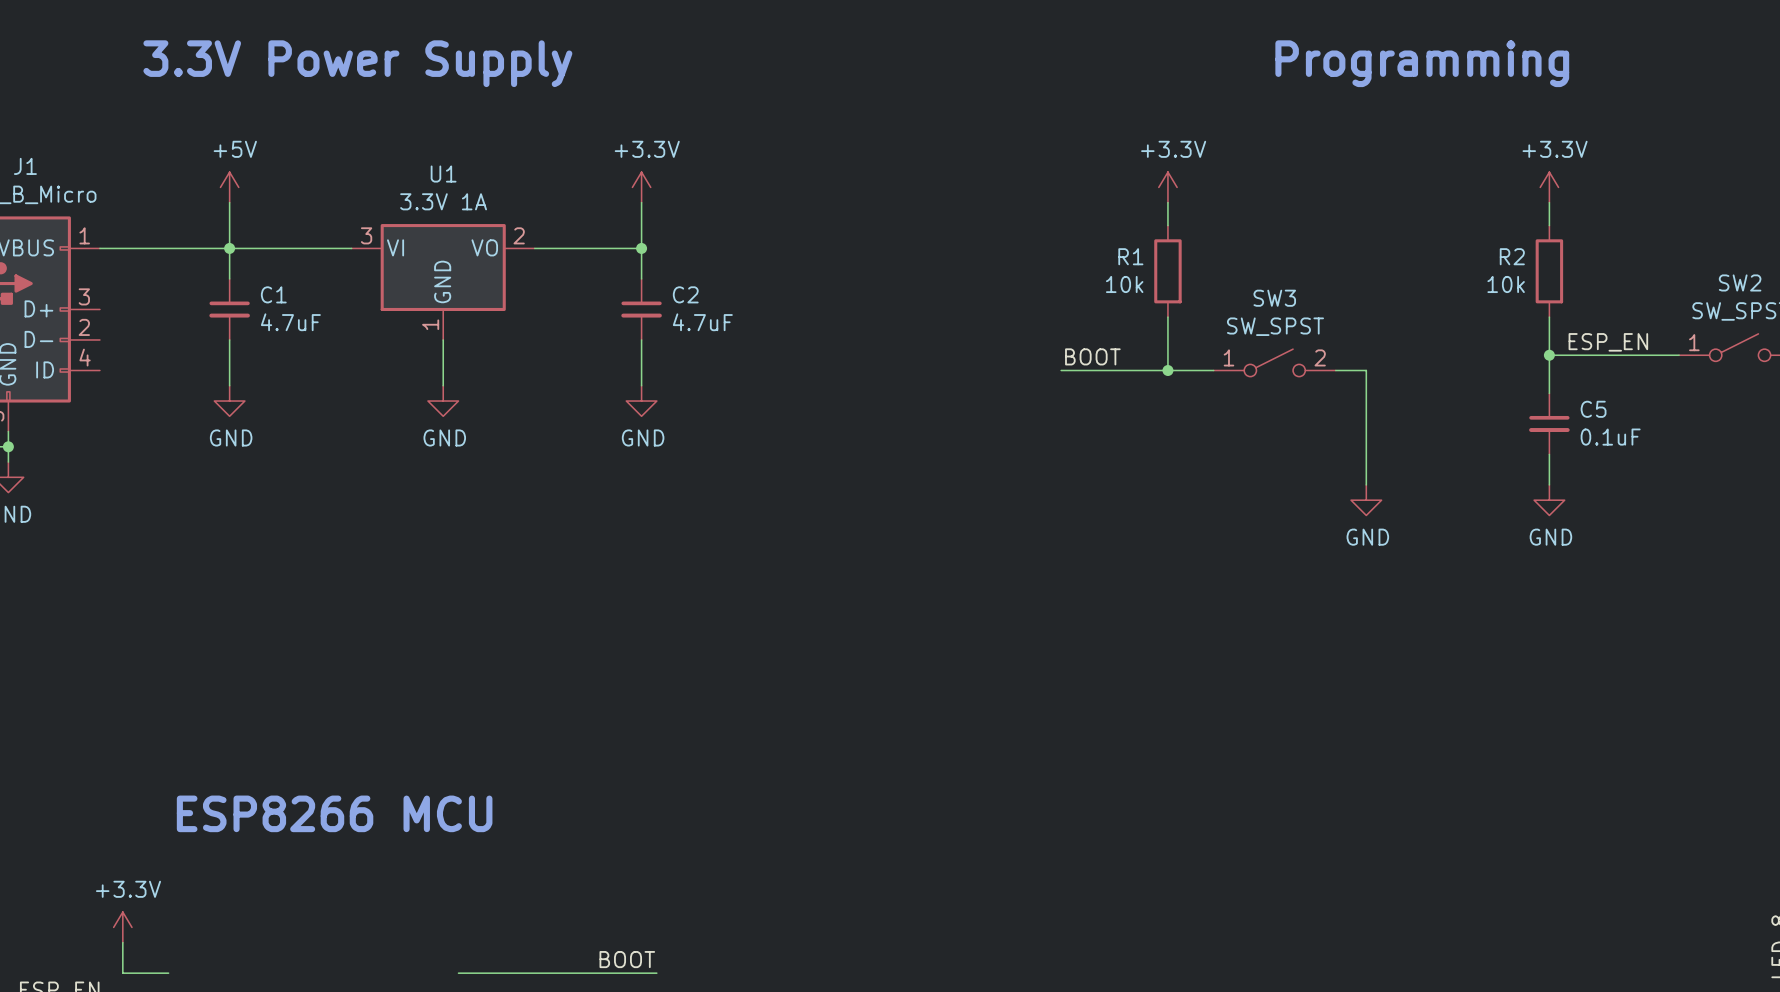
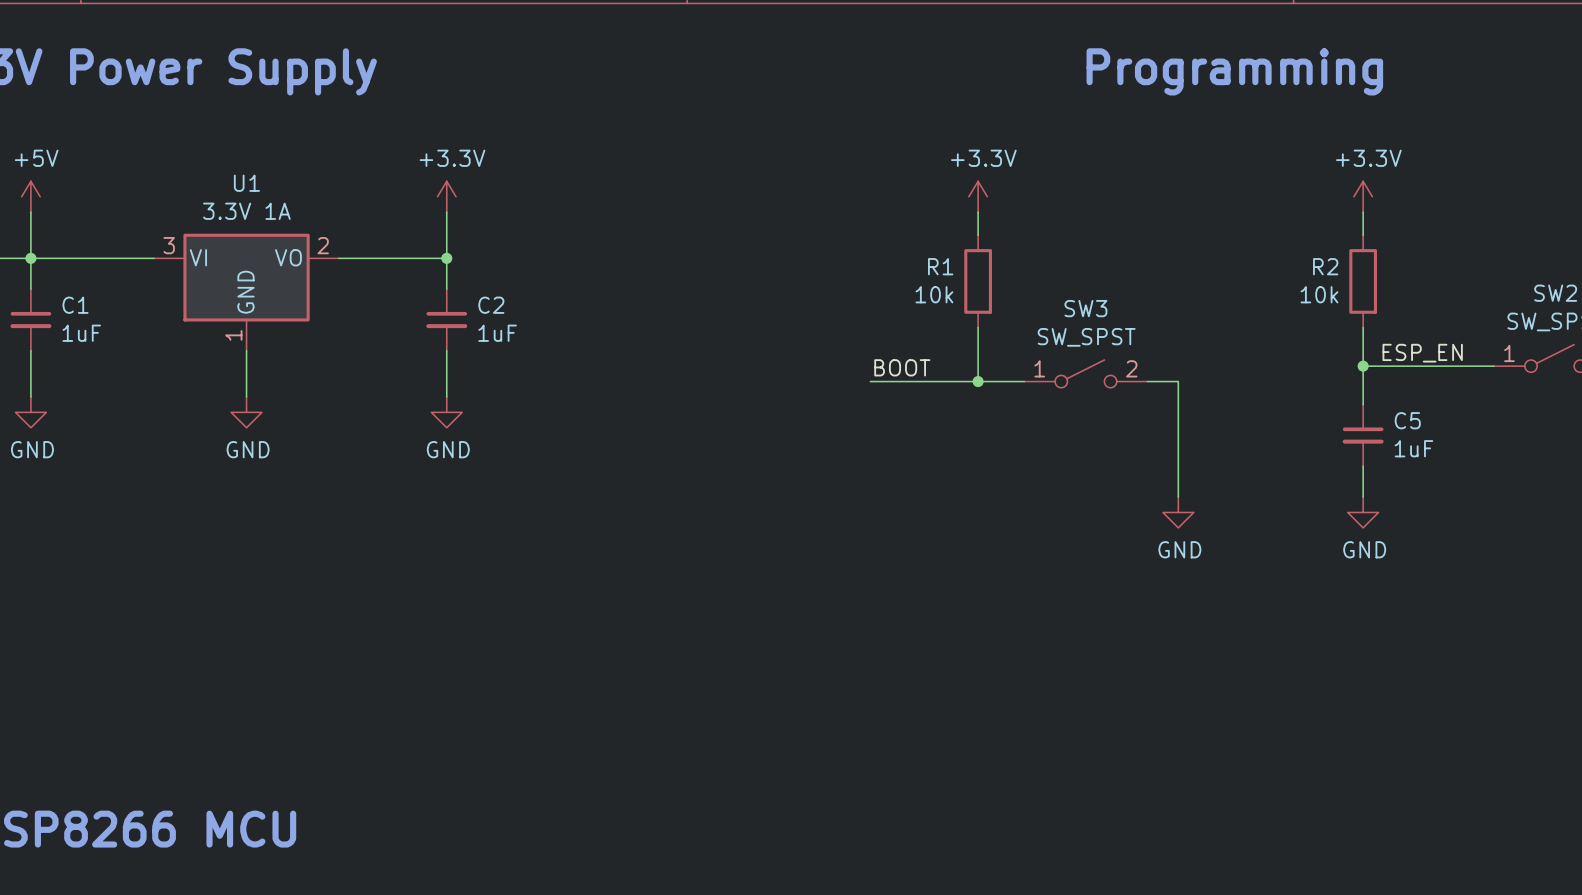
C1 value: 4.7uF (290, 322) -> 1uF (81, 333)
C2 value: 4.7uF (702, 322) -> 1uF (497, 333)
C5 value: 0.1uF (1610, 437) -> 1uF (1413, 448)

